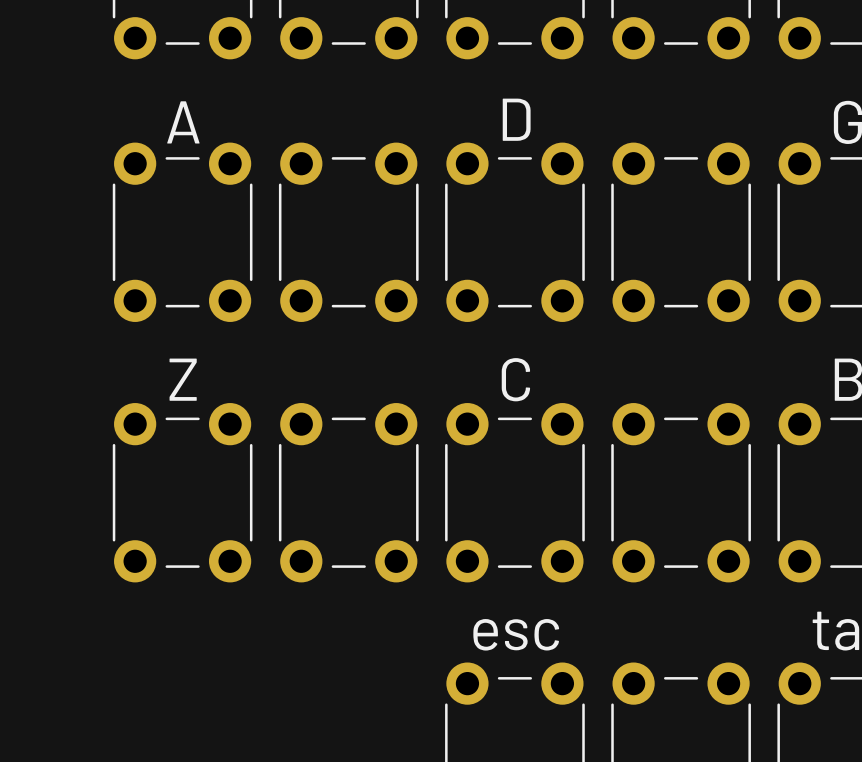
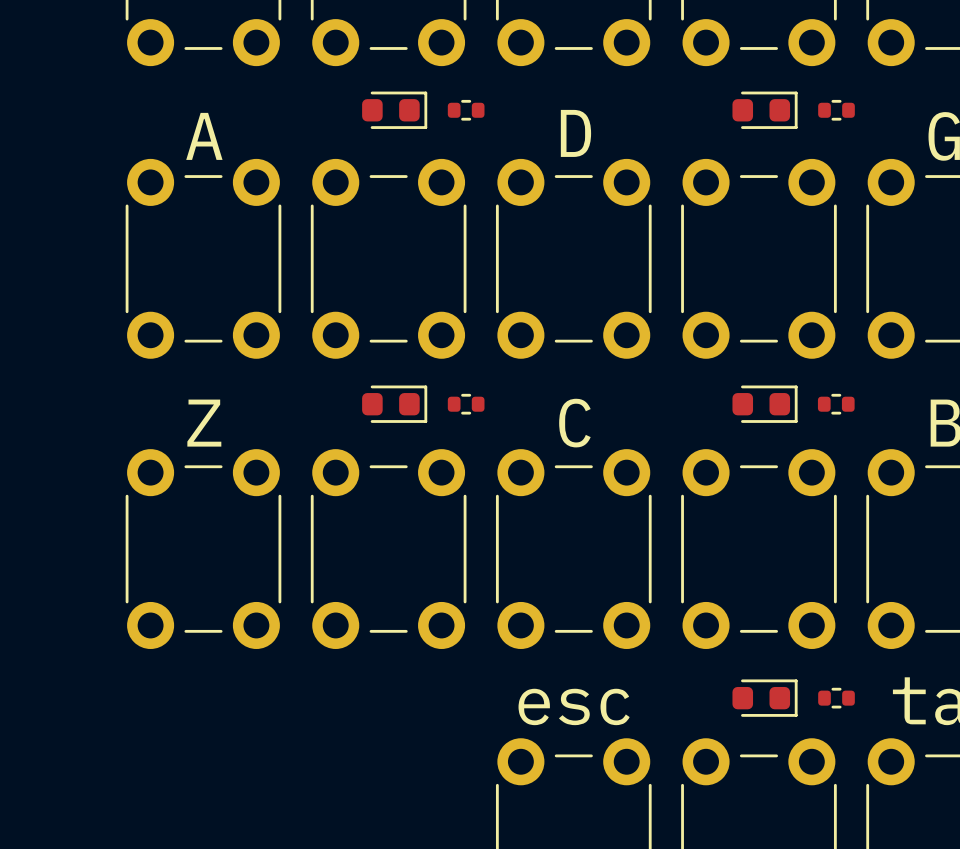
part: none -> (394, 110)
part: none -> (466, 110)
part: none -> (765, 110)
part: none -> (836, 110)
part: none -> (394, 404)
part: none -> (466, 404)
part: none -> (765, 404)
part: none -> (836, 404)
part: none -> (765, 698)
part: none -> (836, 698)

